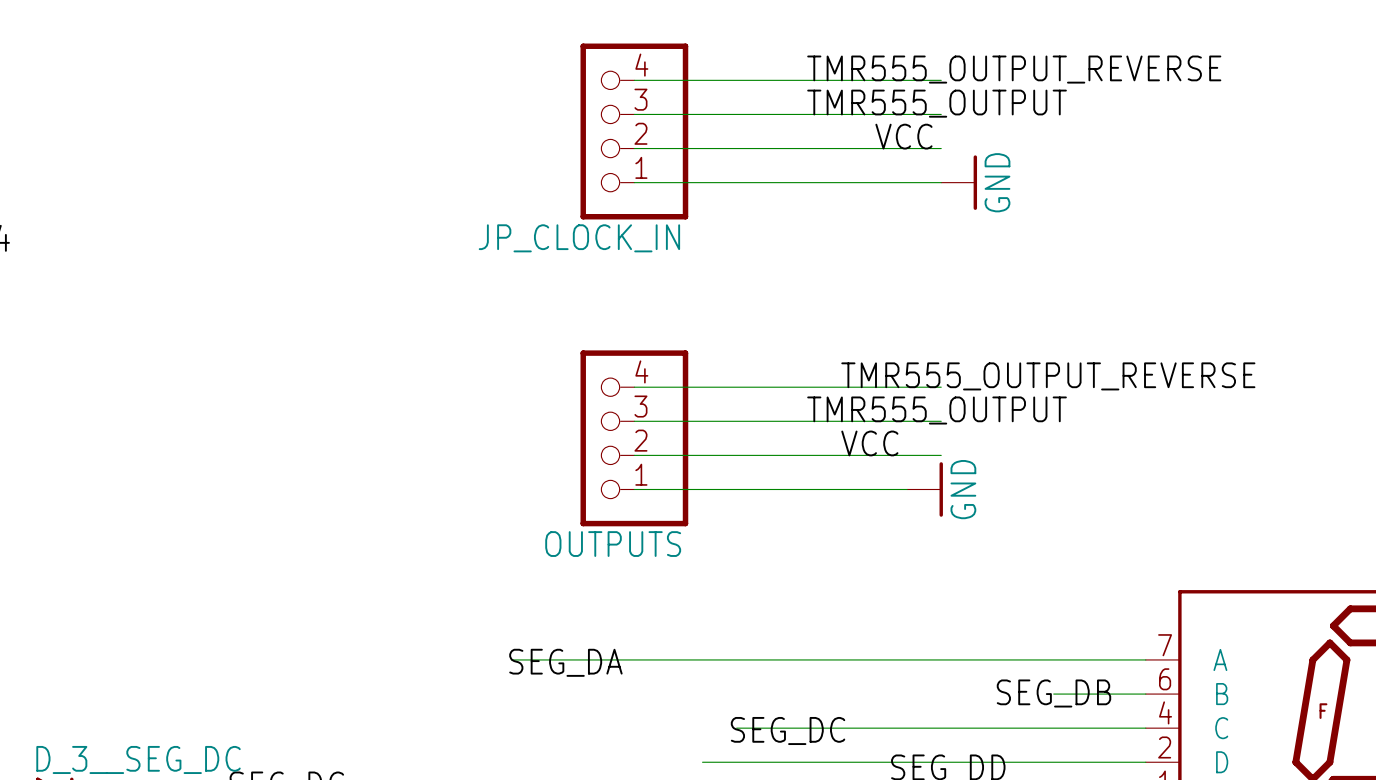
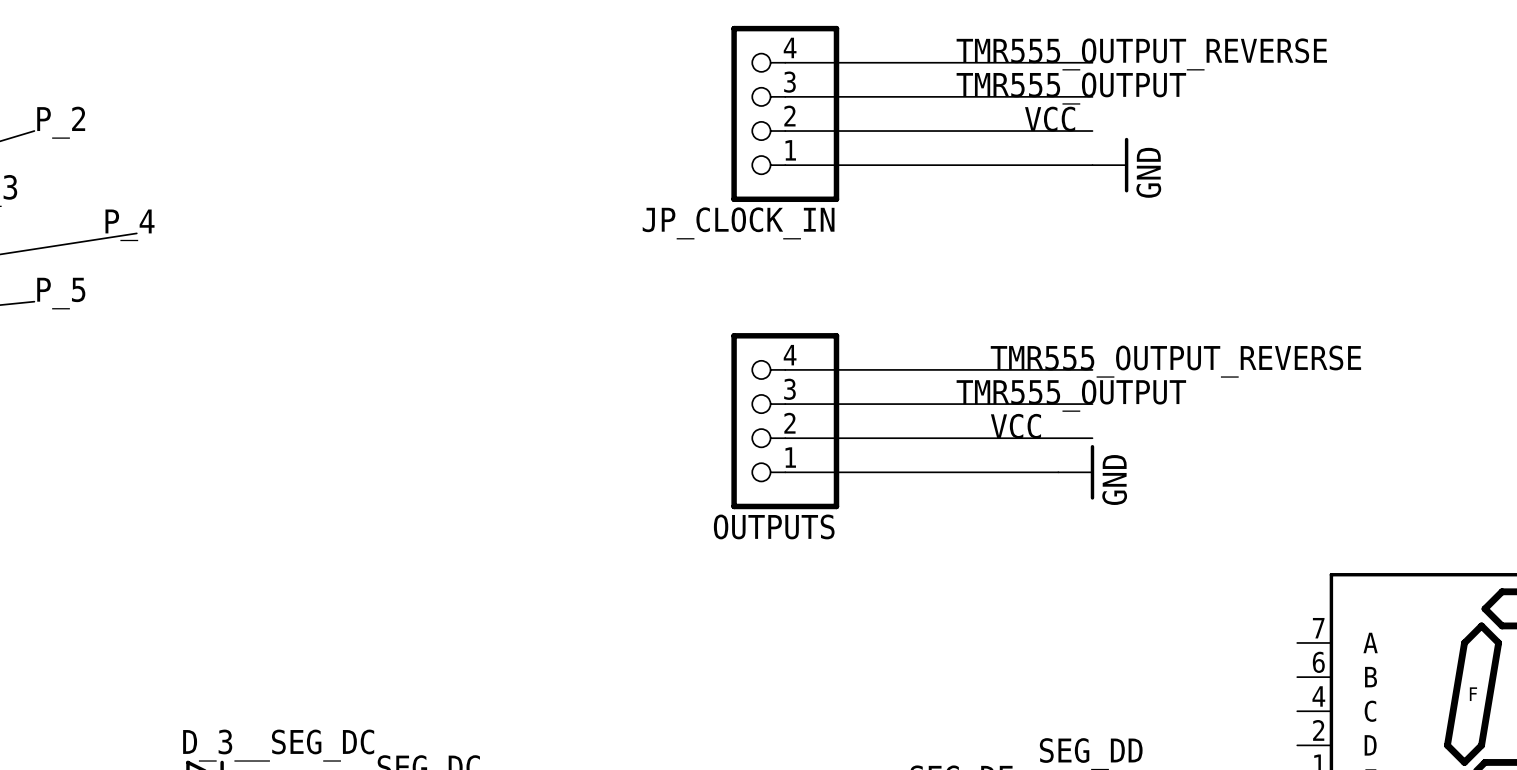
wire: (511, 659) (1145, 659) -> none
label: SEG_DA (565, 662) -> none
label: SEG_DB (1053, 693) -> none
wire: (1053, 694) (1145, 694) -> none
wire: (736, 728) (1145, 728) -> none
label: SEG_DC (788, 730) -> none
wire: (702, 762) (1145, 762) -> none

